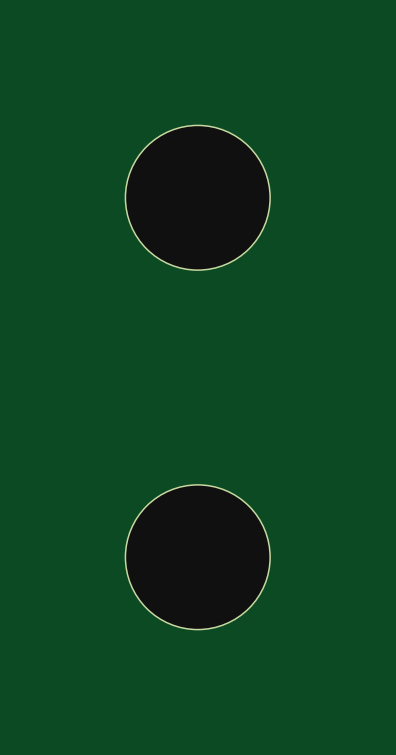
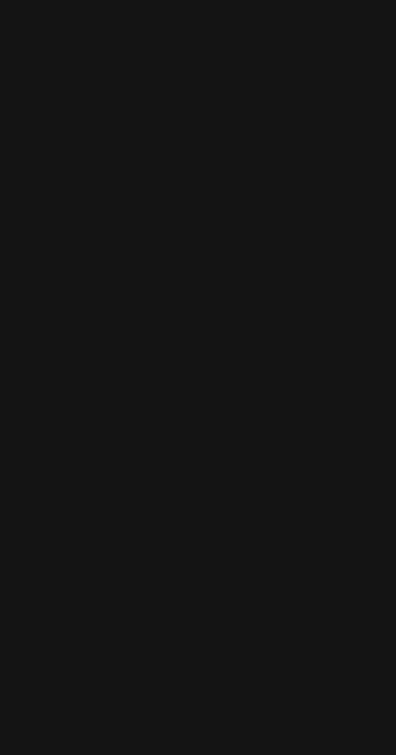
part: (197, 197) -> none
part: (197, 557) -> none

